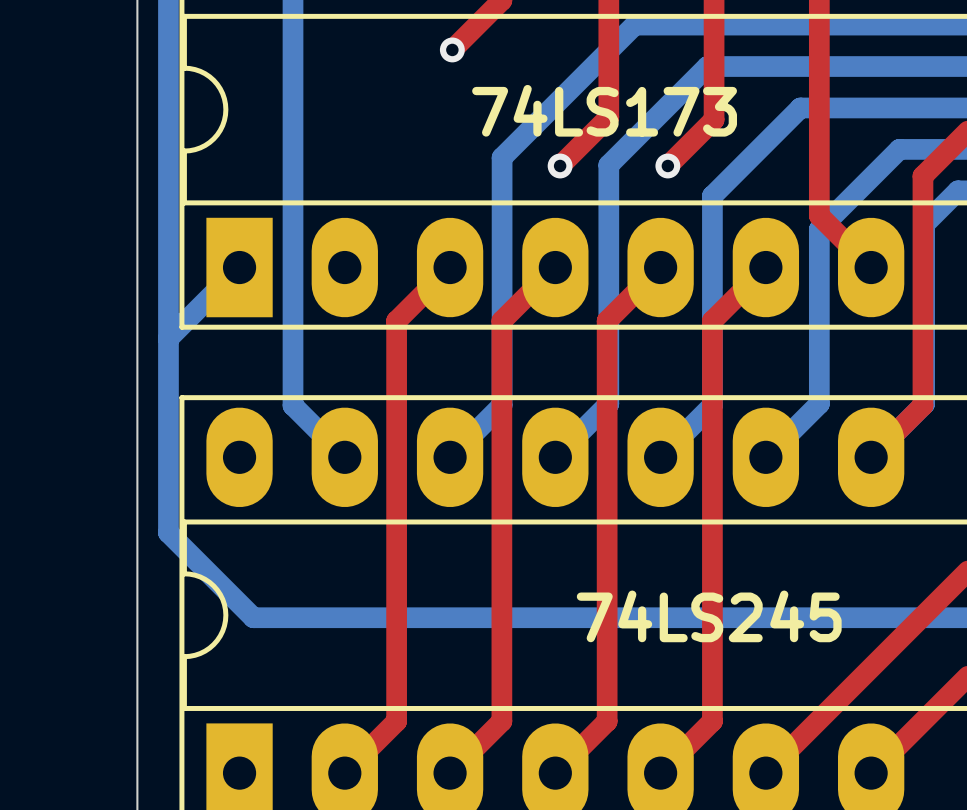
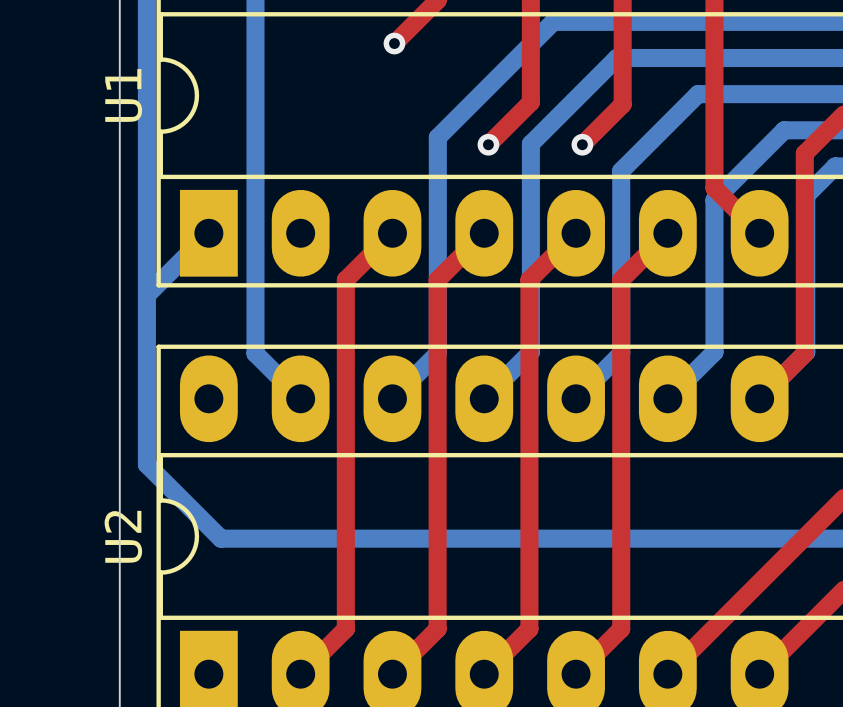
U1 name: none -> U1 (123, 95)
text: 74LS173 (604, 110) -> none
U2 name: none -> U2 (123, 536)
text: 74LS245 (709, 616) -> none

